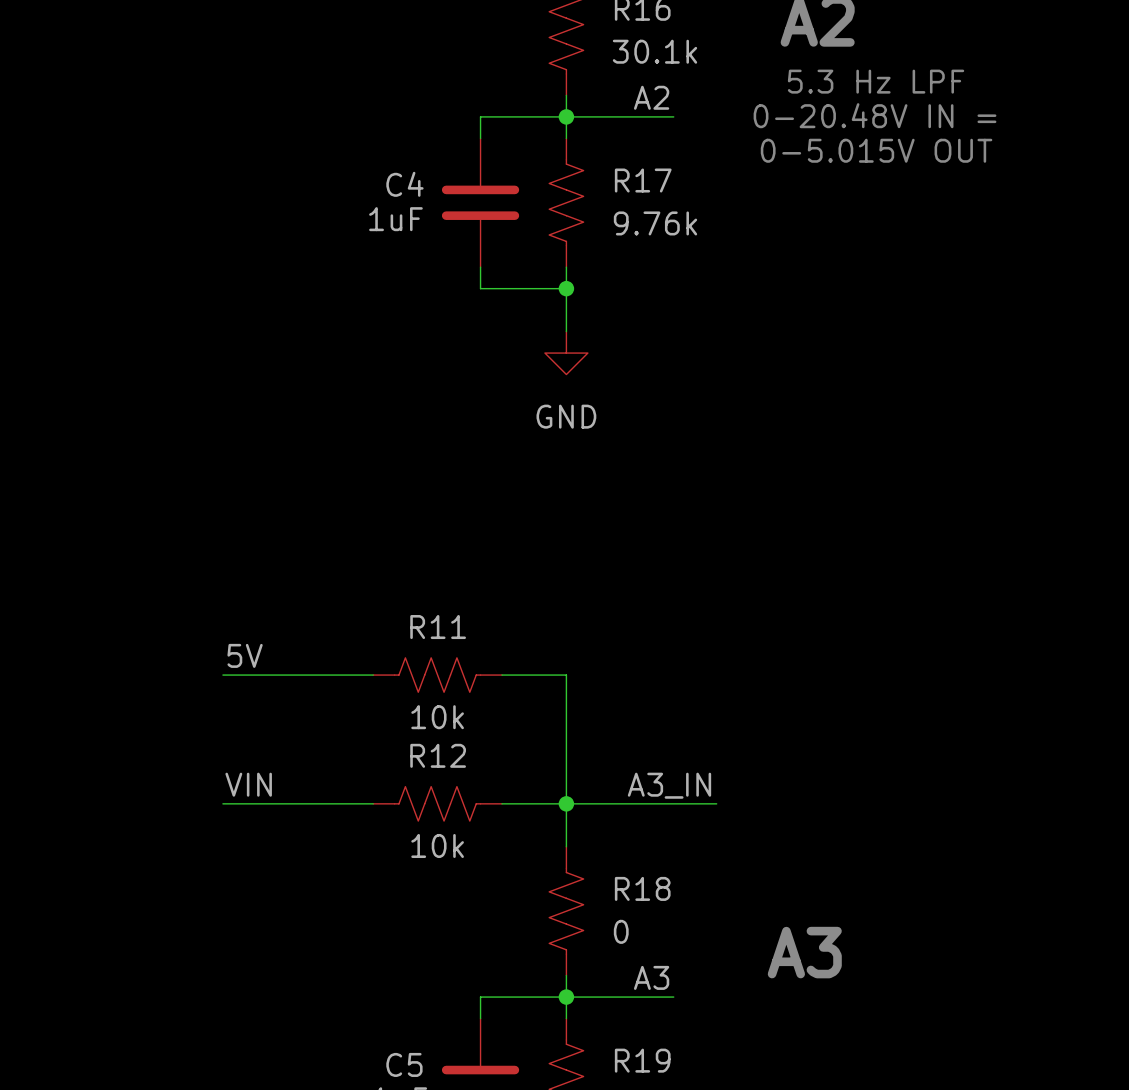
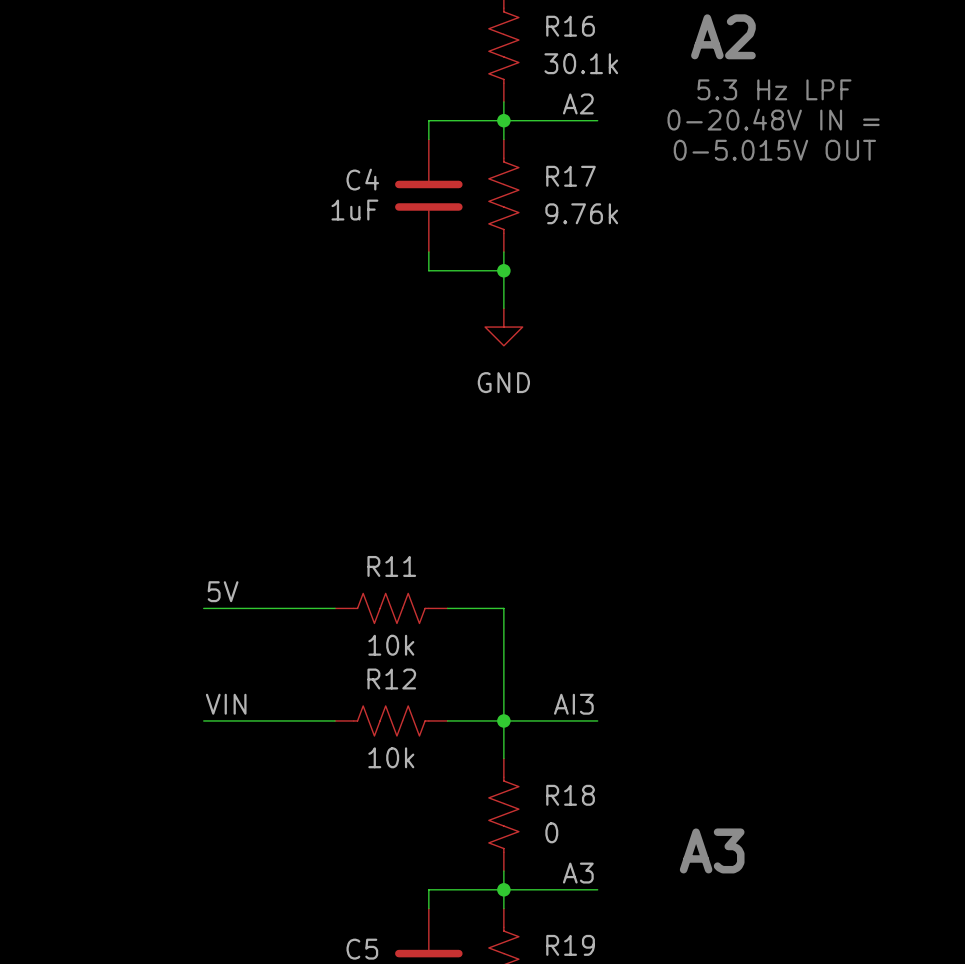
label: none -> AI3 (573, 704)
label: A3_IN (669, 785) -> none
wire: (673, 803) (716, 803) -> none

